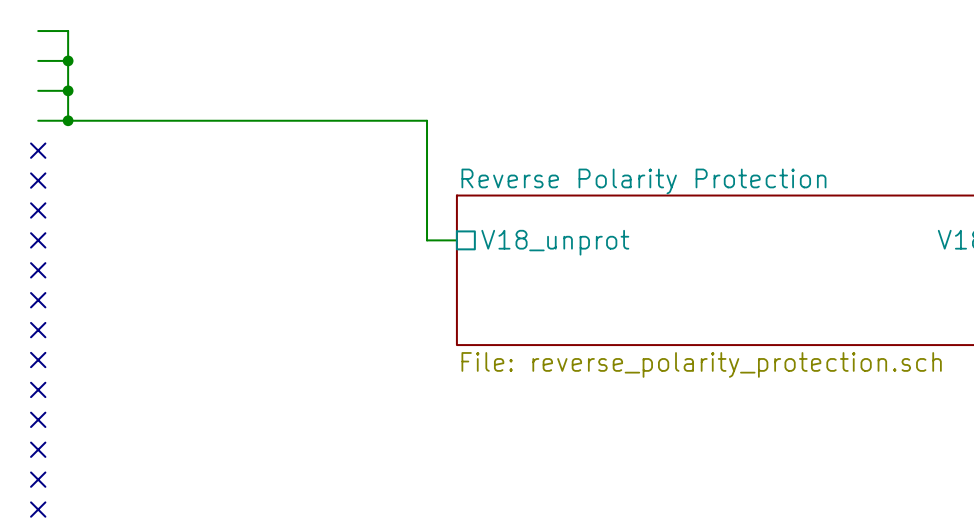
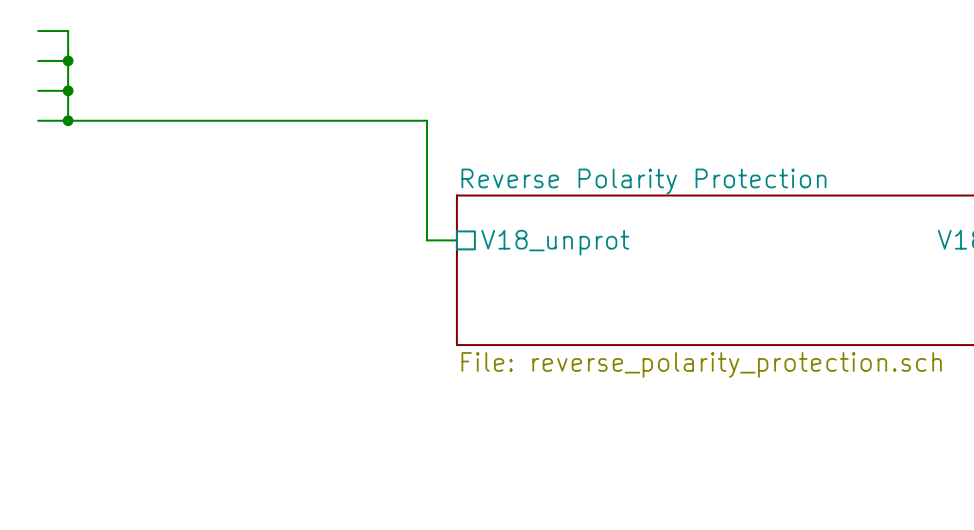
no-connect mark: (38, 150) -> none
no-connect mark: (38, 180) -> none
no-connect mark: (38, 210) -> none
no-connect mark: (38, 240) -> none
no-connect mark: (38, 270) -> none
no-connect mark: (38, 300) -> none
no-connect mark: (38, 330) -> none
no-connect mark: (38, 360) -> none
no-connect mark: (38, 389) -> none
no-connect mark: (38, 419) -> none
no-connect mark: (38, 449) -> none
no-connect mark: (38, 479) -> none
no-connect mark: (38, 509) -> none

